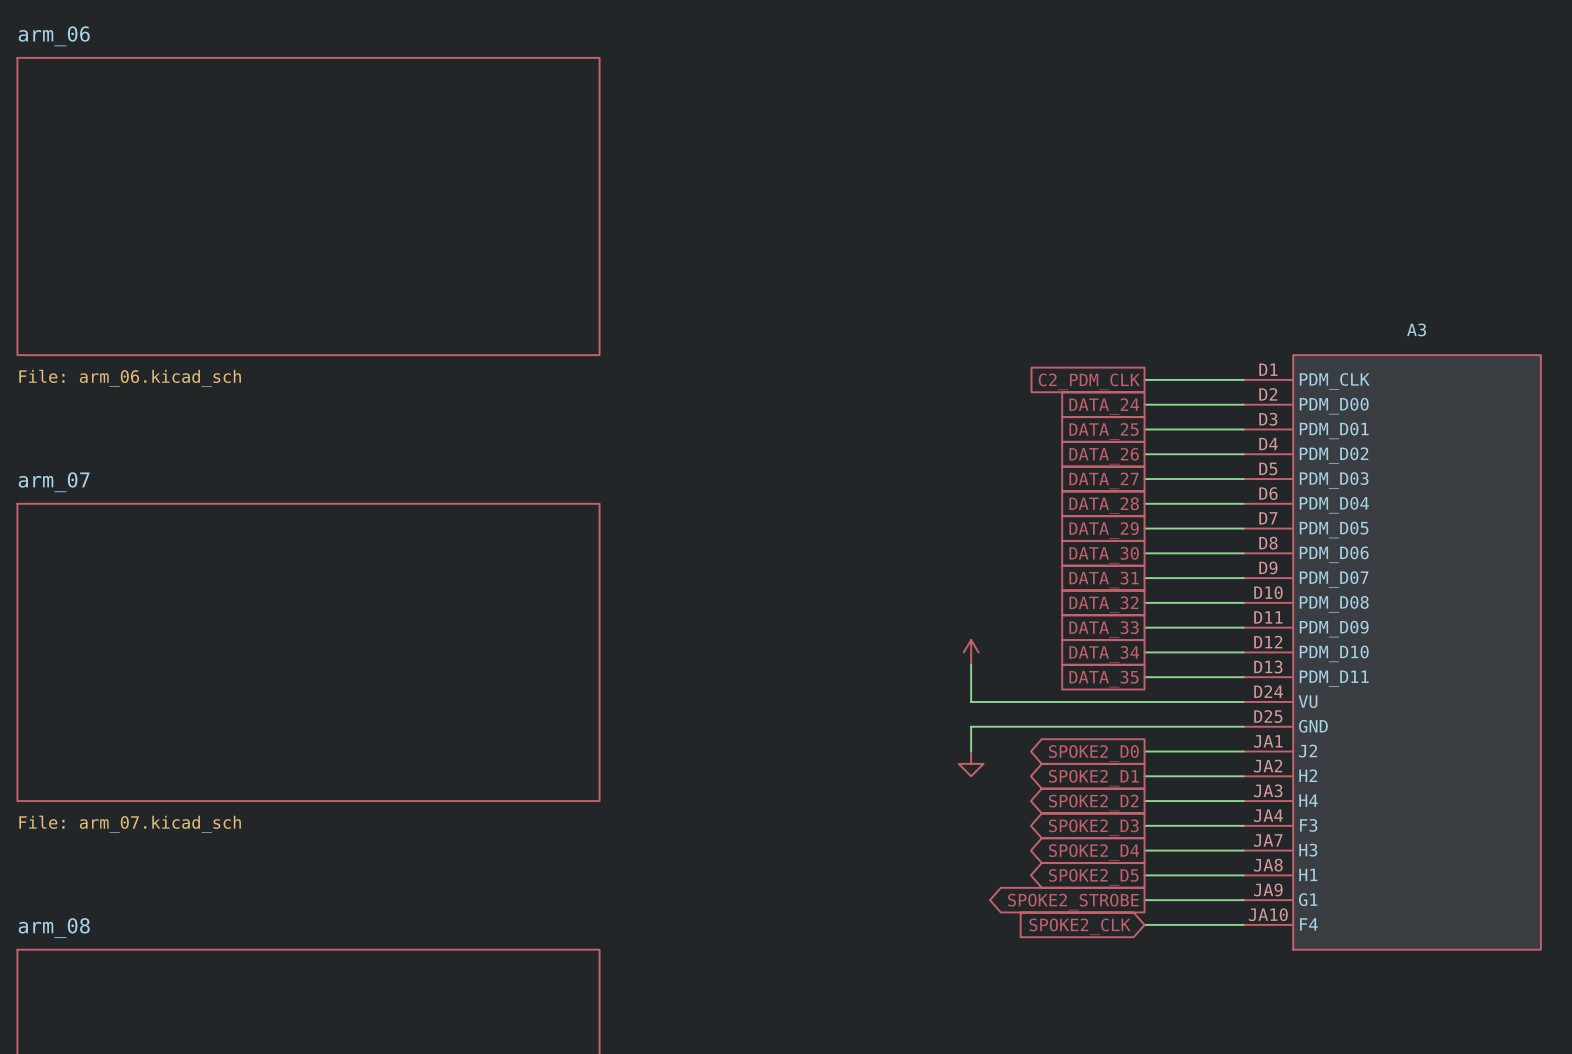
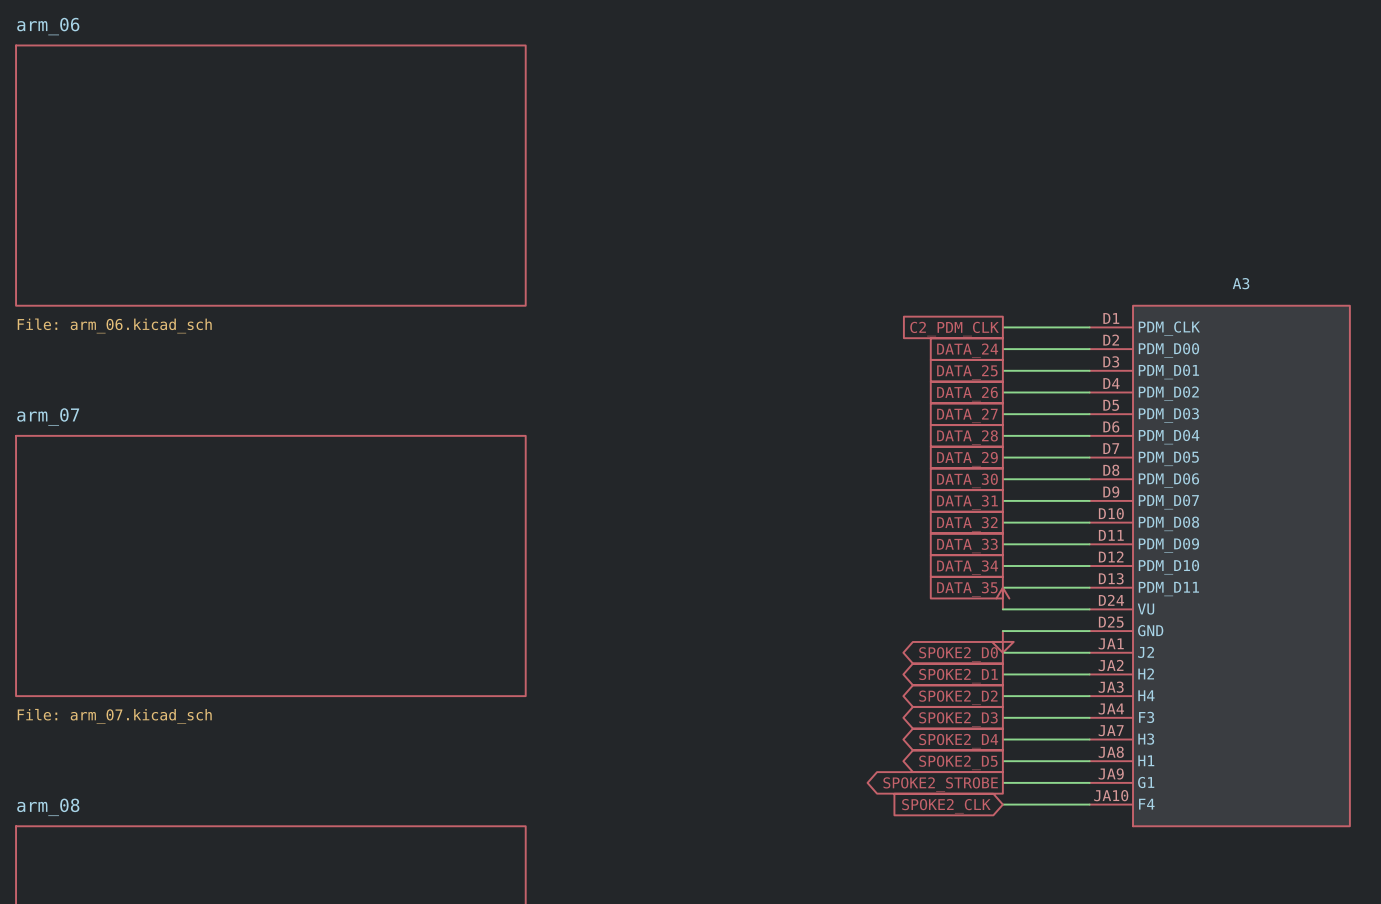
power symbol position: (971, 652) -> (1002, 598)
wire: (971, 664) (971, 701) (1144, 701) -> none
wire: (1144, 726) (971, 726) (971, 751) -> none
power symbol position: (971, 763) -> (1002, 641)

